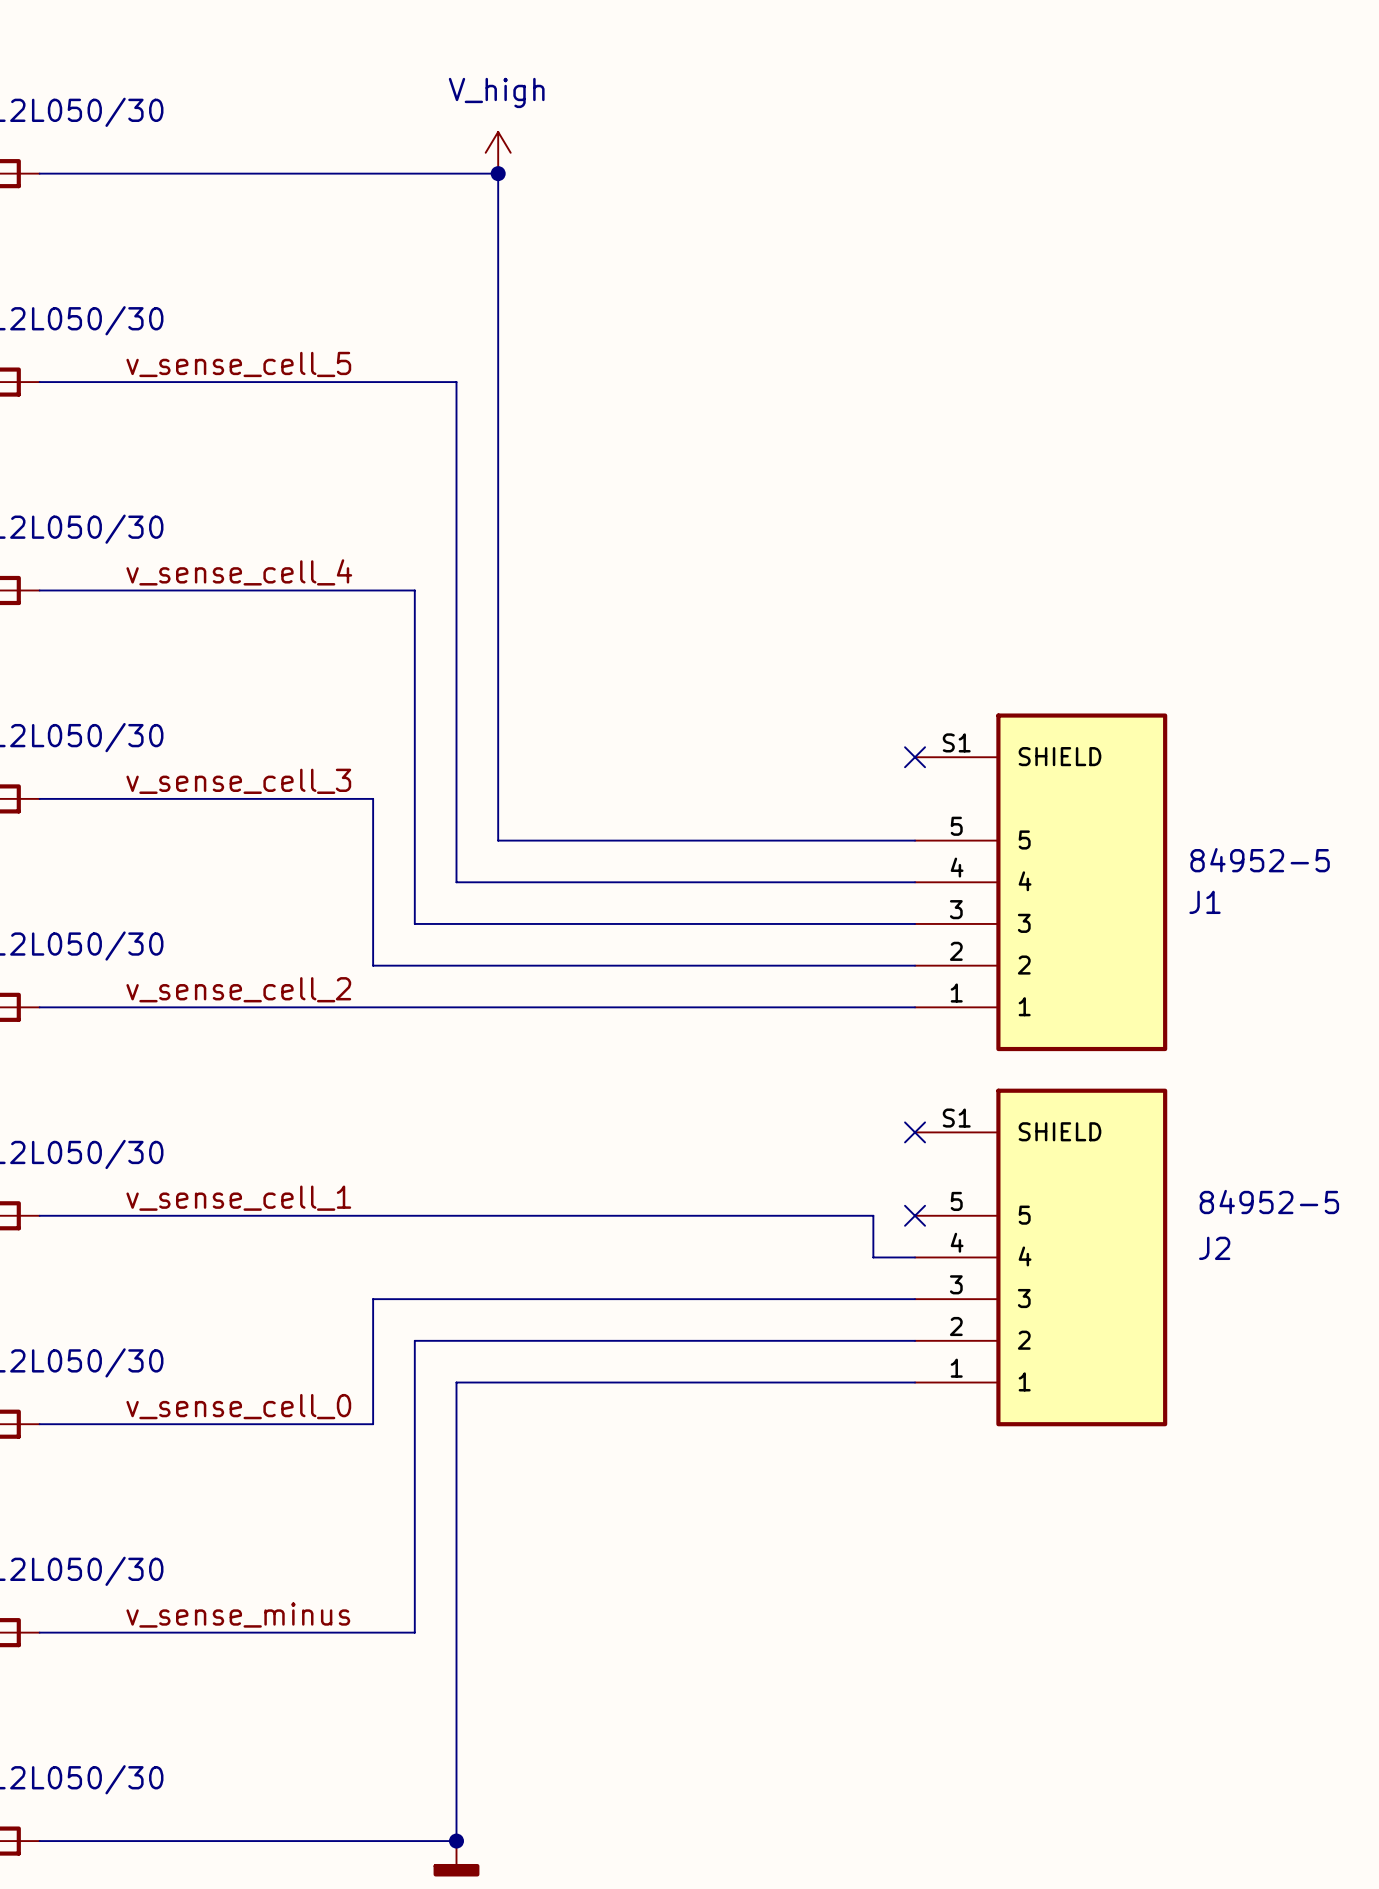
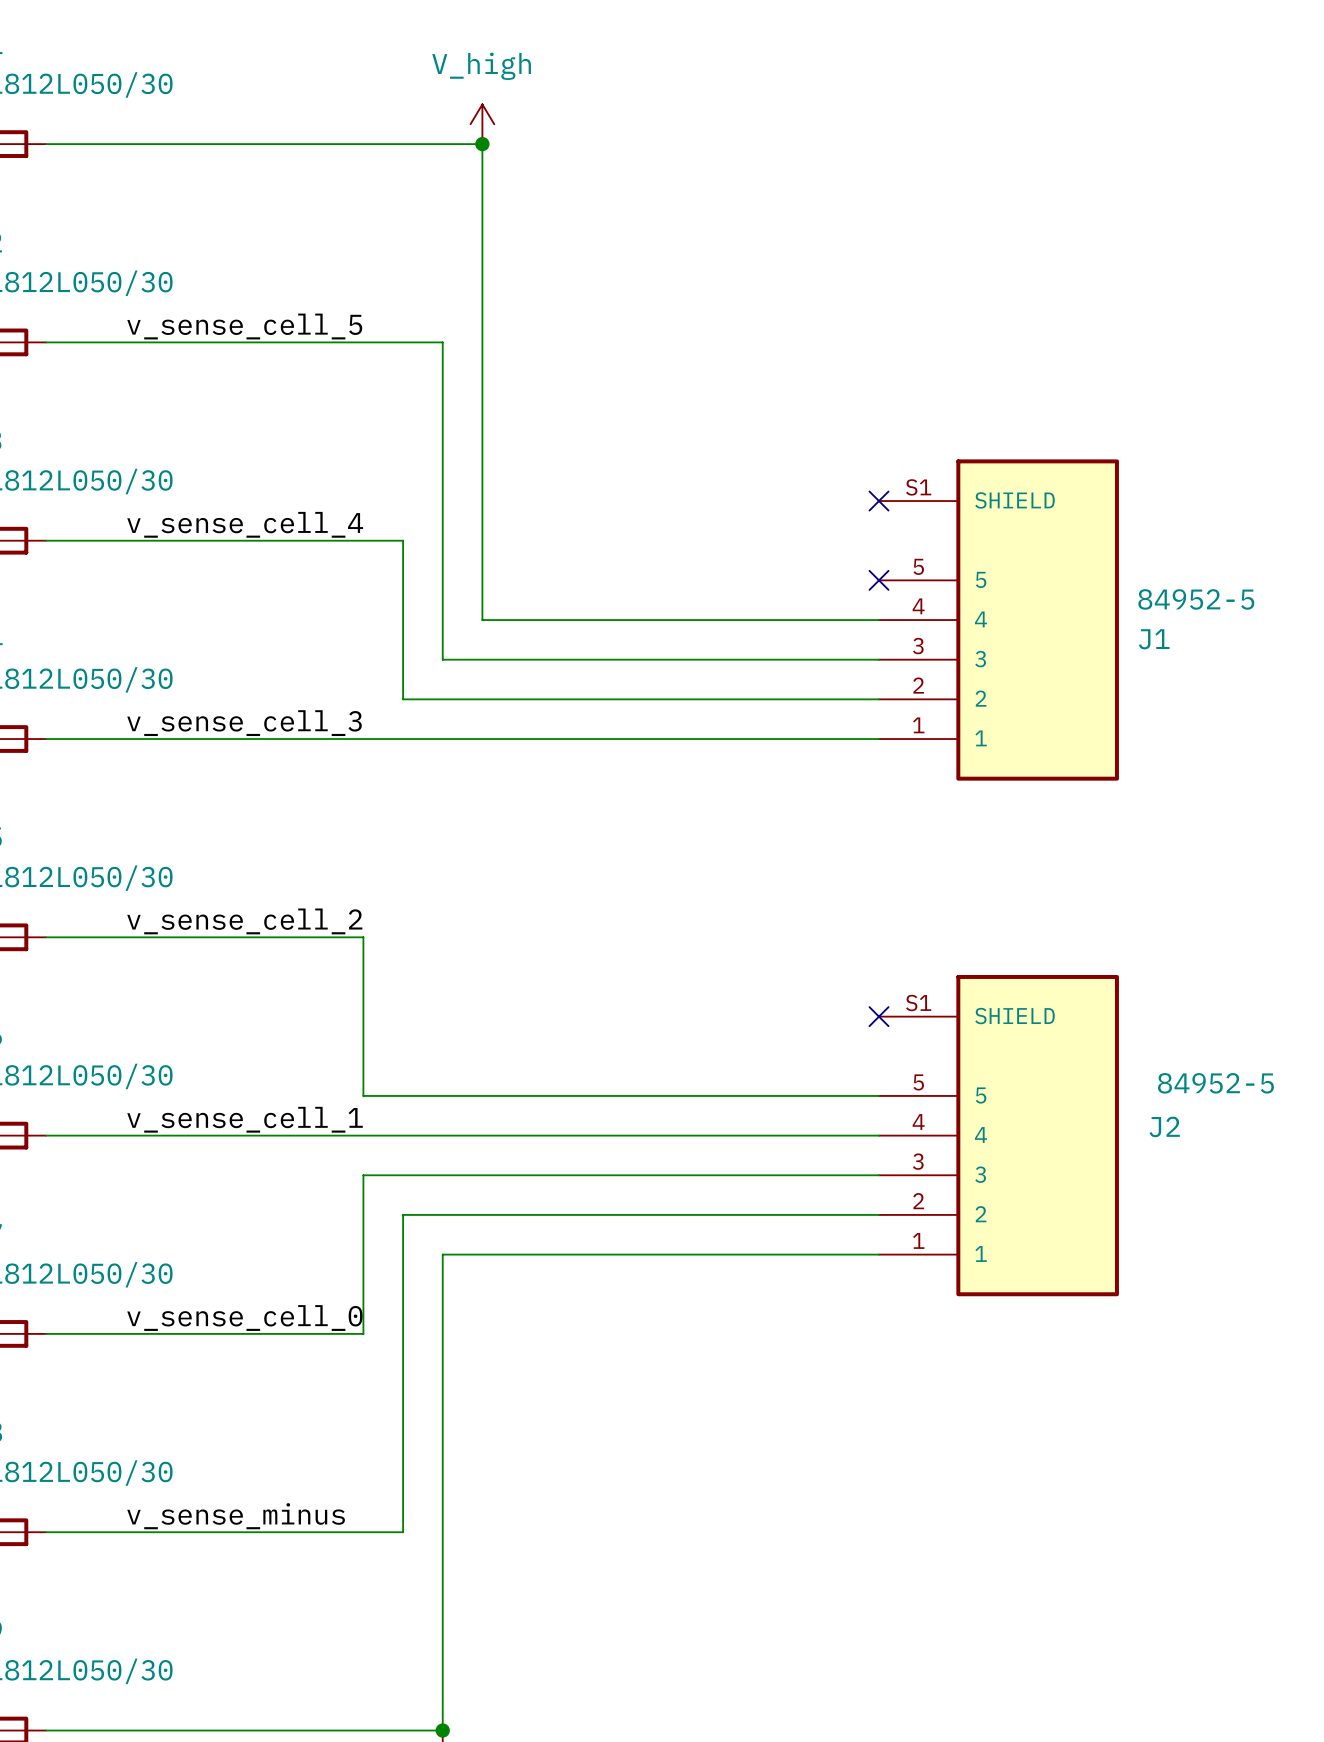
no-connect mark: none -> (879, 501)
no-connect mark: none -> (879, 580)
wire: (498, 673) (498, 840) (915, 840) -> (482, 620) (879, 620)
wire: (456, 715) (456, 882) (915, 882) -> (442, 659) (879, 659)
wire: (414, 757) (414, 923) (915, 923) -> (403, 699) (879, 699)
no-connect mark: (915, 757) -> none
wire: (373, 798) (373, 965) (915, 965) -> (363, 739) (879, 739)
J1 position: (1041, 882) -> (998, 620)
wire: (373, 1007) (915, 1007) -> (363, 937) (363, 1095) (879, 1095)
no-connect mark position: (915, 1132) -> (879, 1016)
wire: (873, 1215) (873, 1257) -> (839, 1135) (879, 1135)
no-connect mark: (915, 1215) -> none
wire: none -> (839, 1175) (363, 1175) (363, 1214)
J2 position: (1041, 1257) -> (998, 1135)
wire: (373, 1299) (414, 1299) -> (403, 1254) (403, 1214)
wire: (414, 1340) (456, 1340) -> (442, 1294) (442, 1254)
wire: (456, 1382) (915, 1382) -> none

